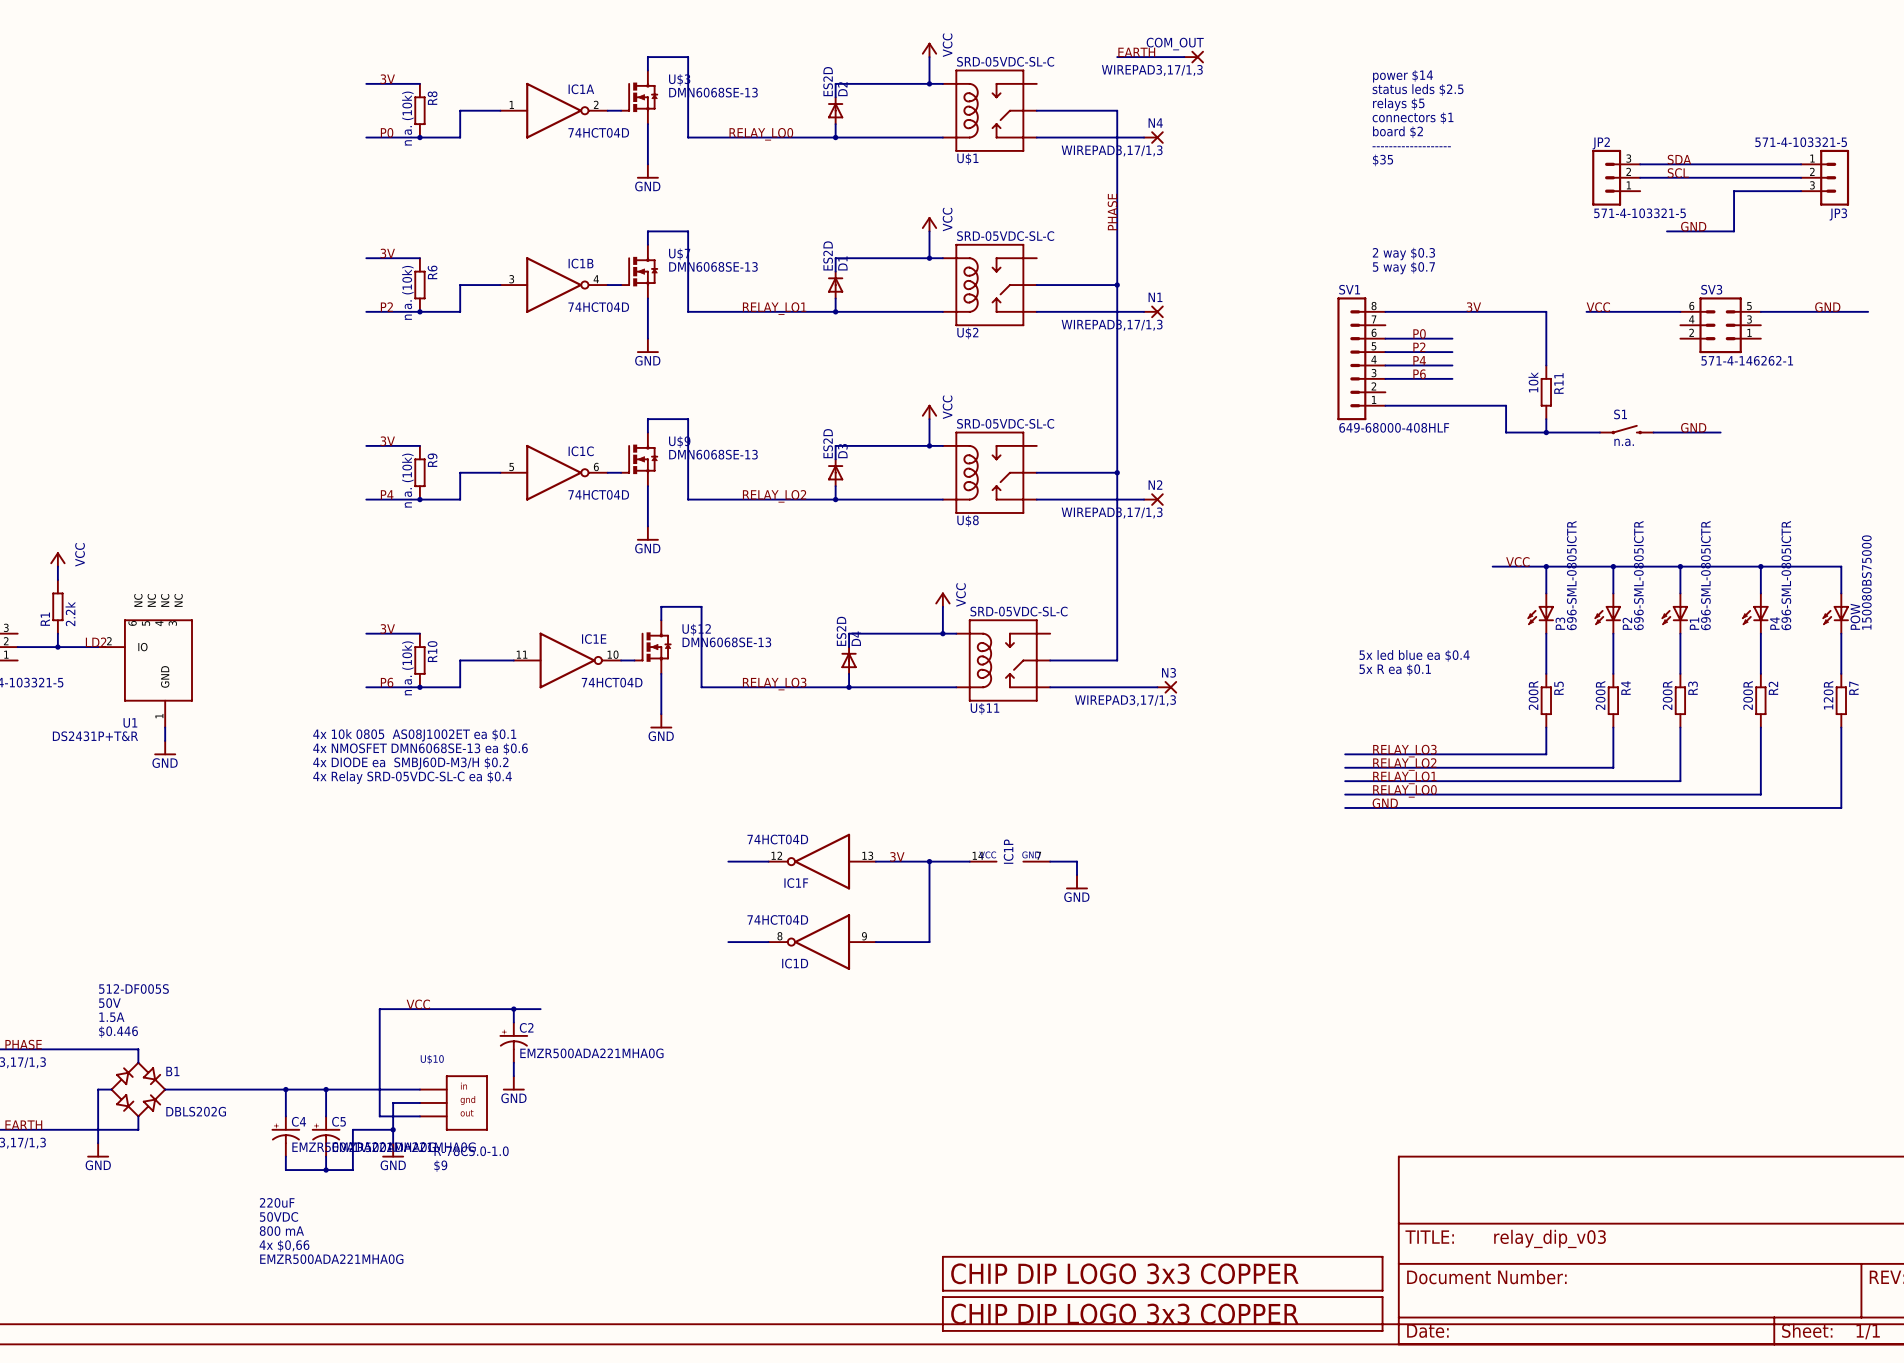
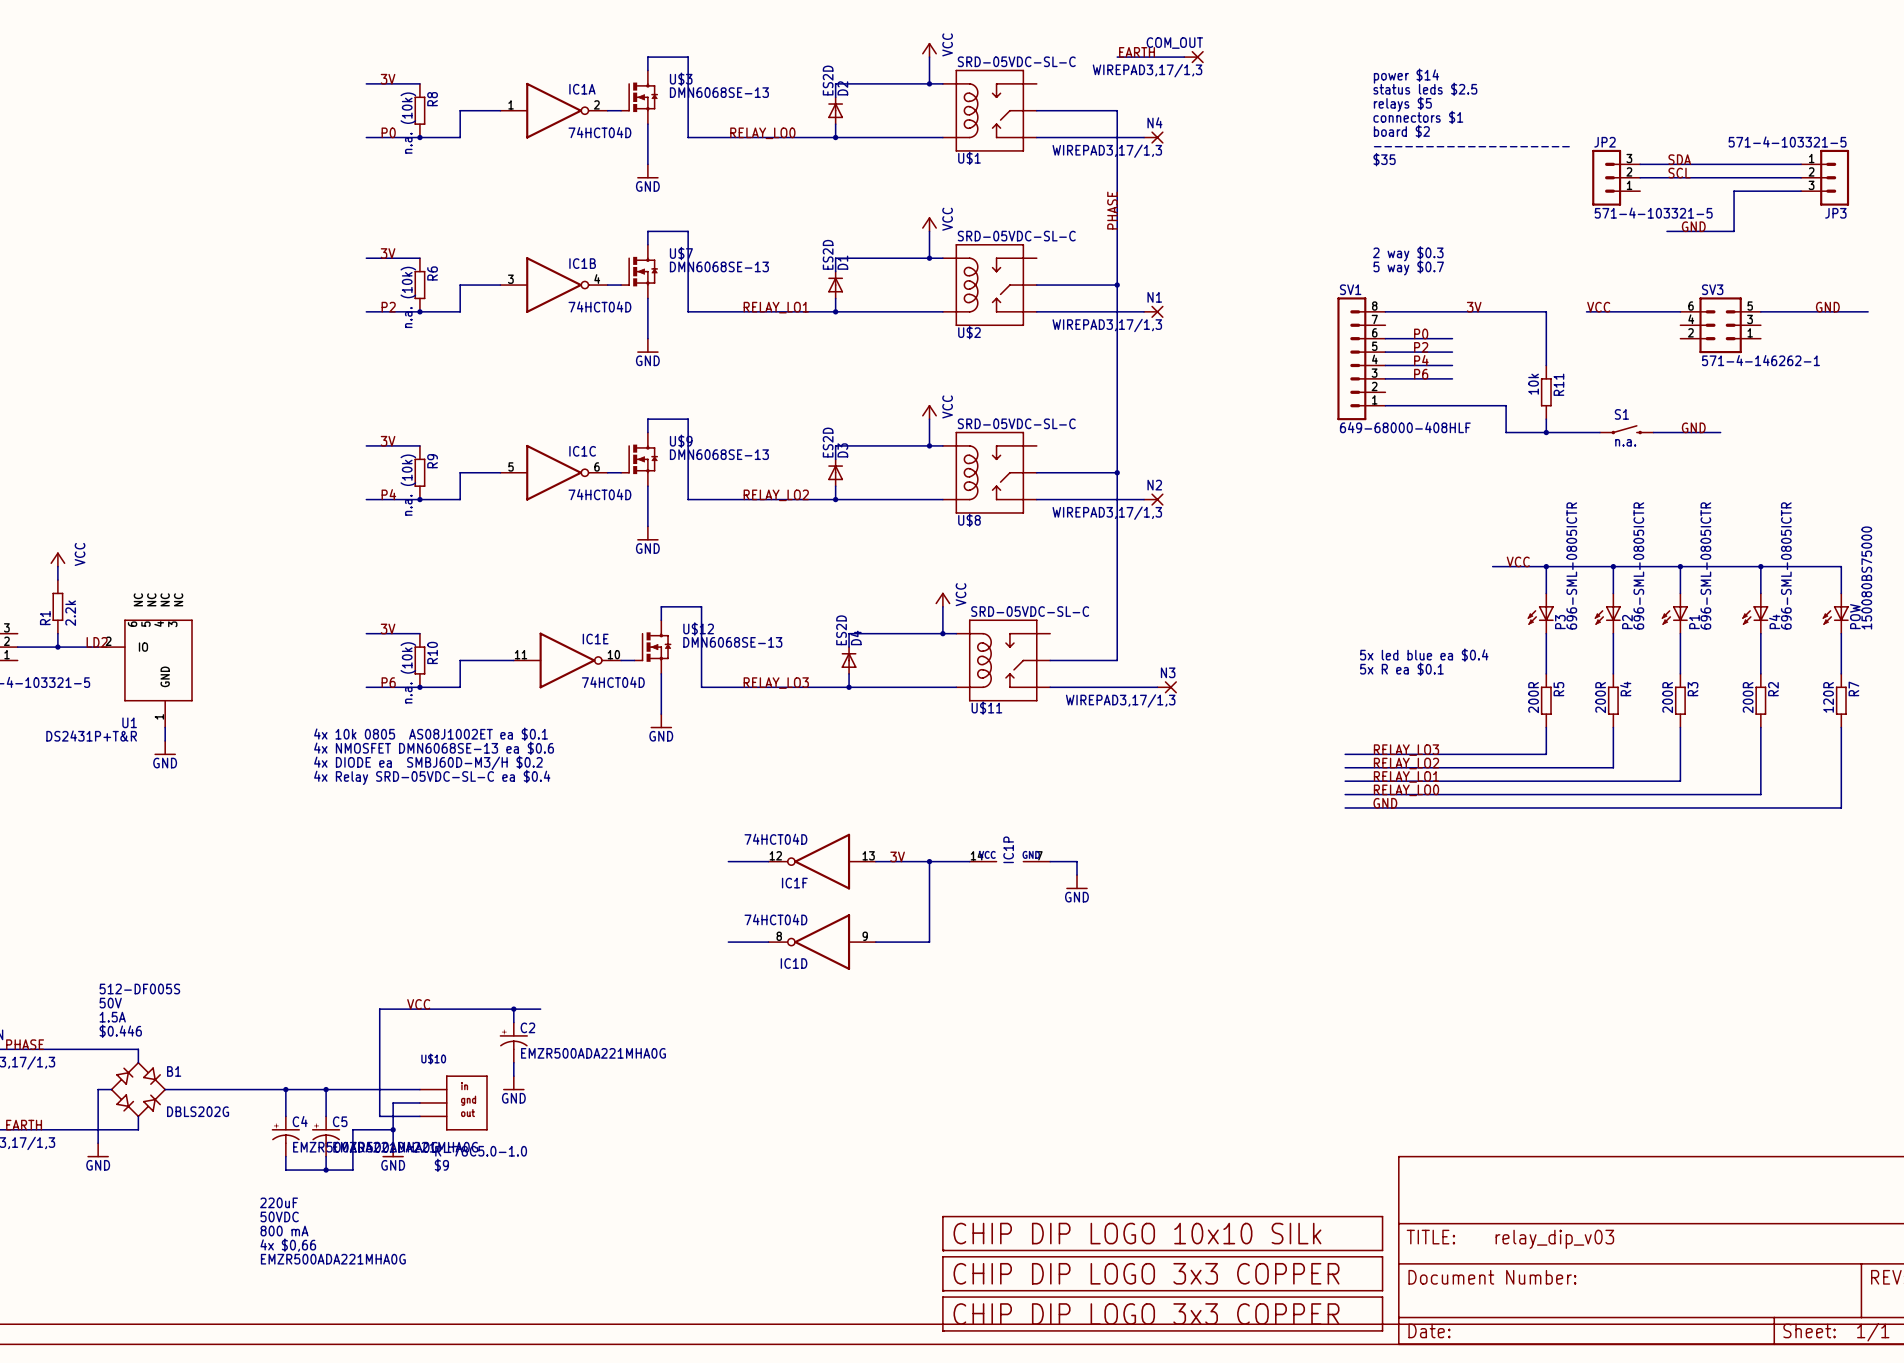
part: none -> (1162, 1233)

